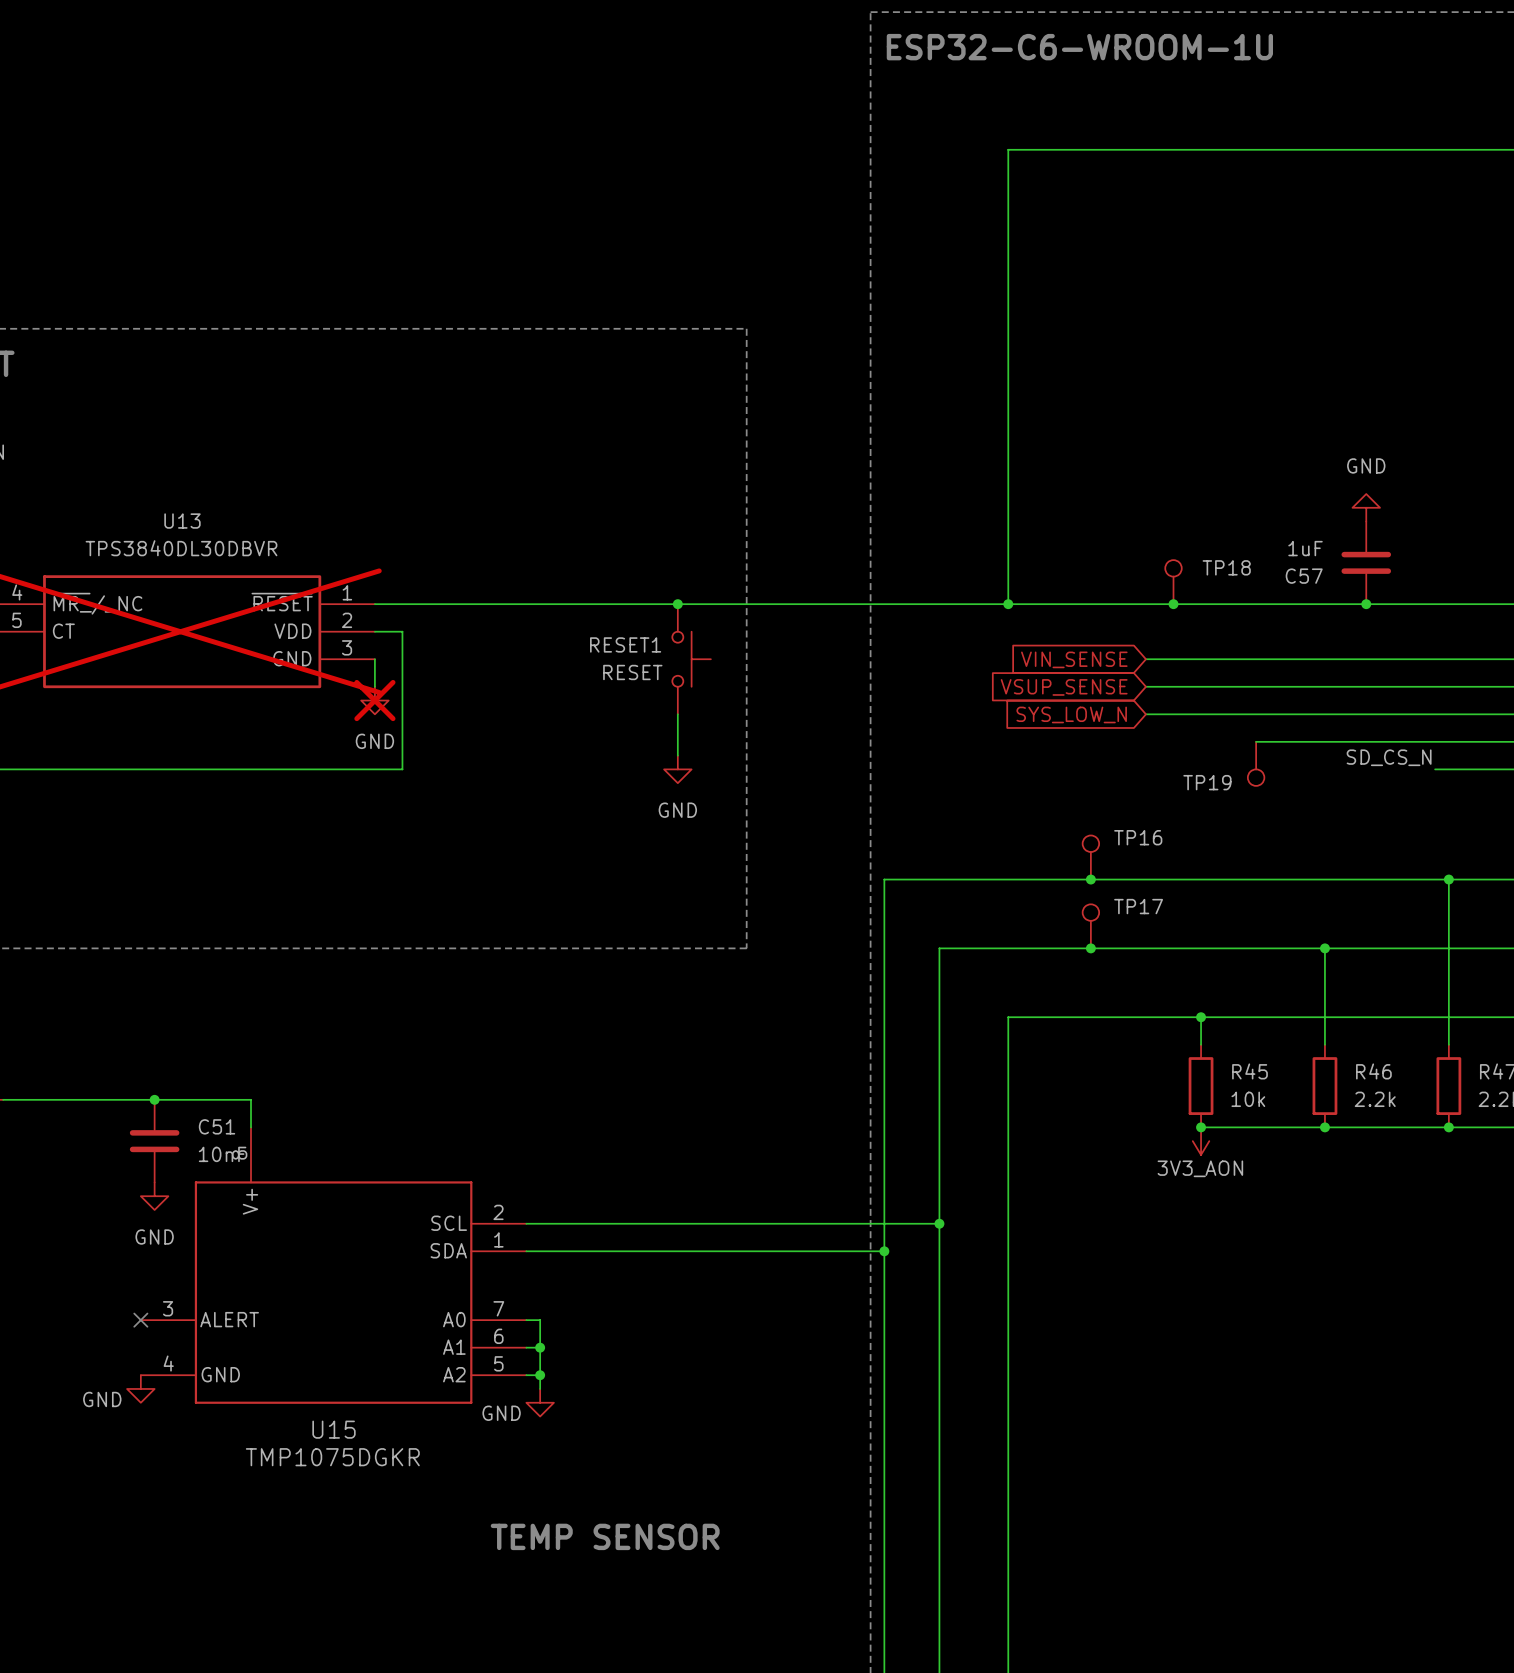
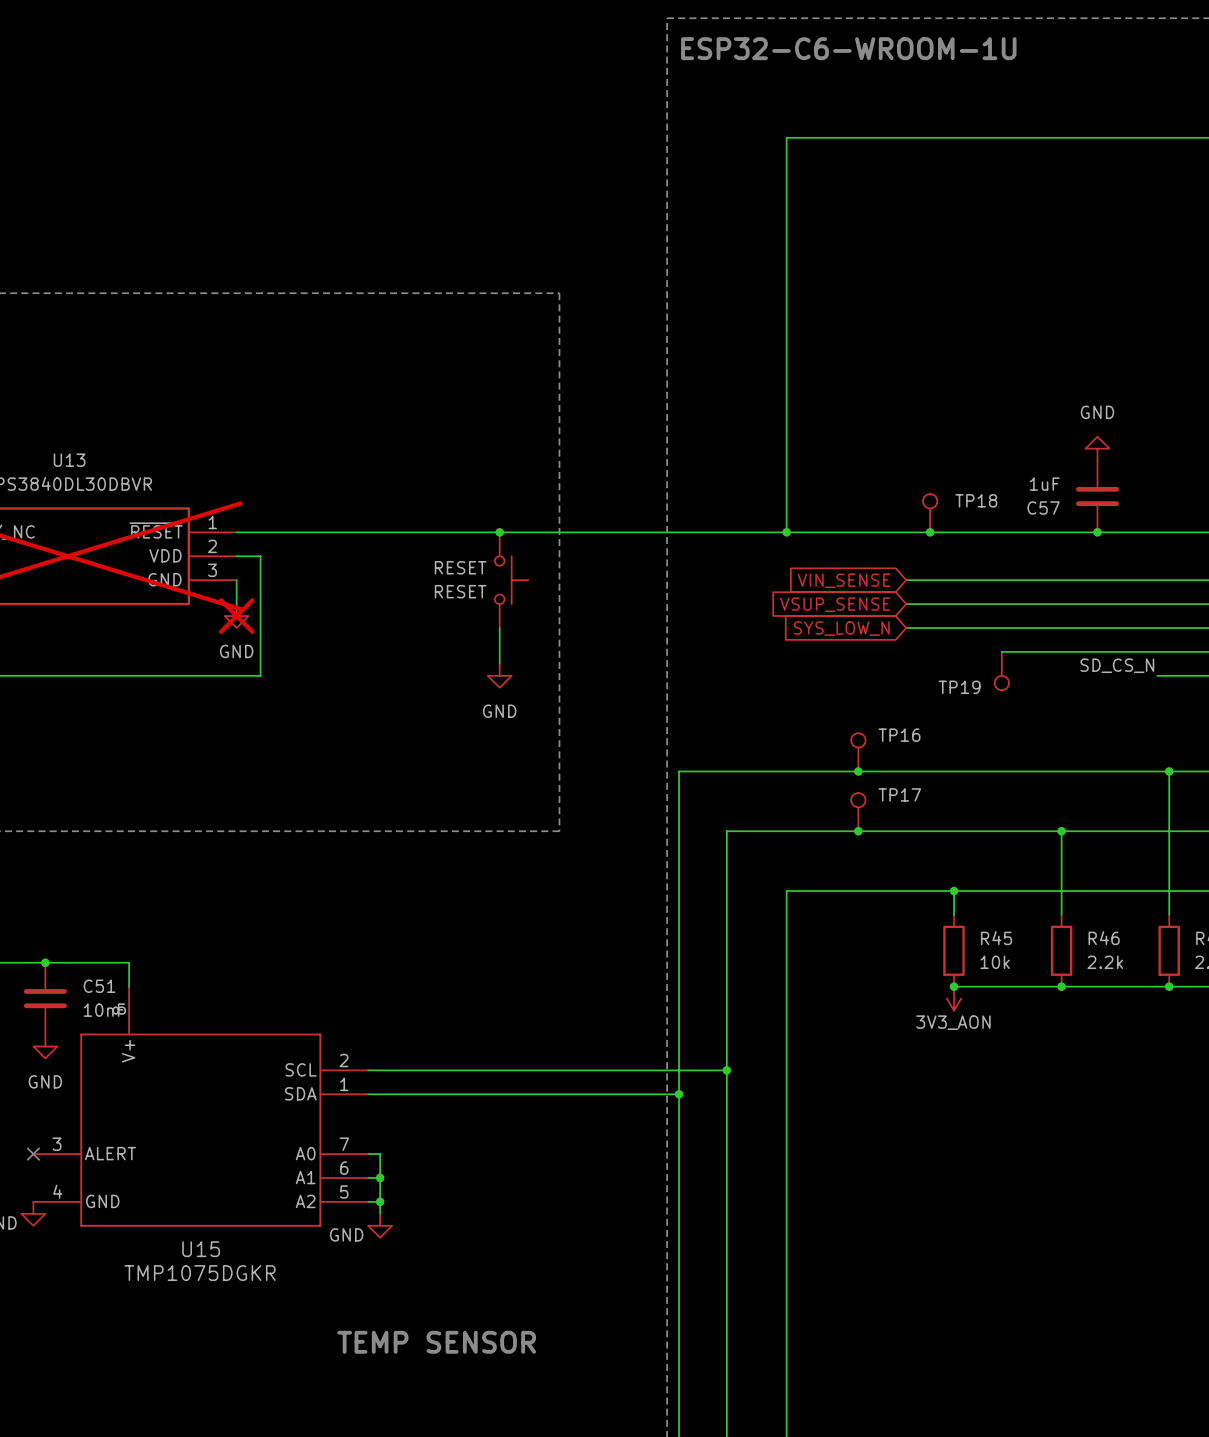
RESET1 name: RESET1 (625, 644) -> RESET (460, 567)

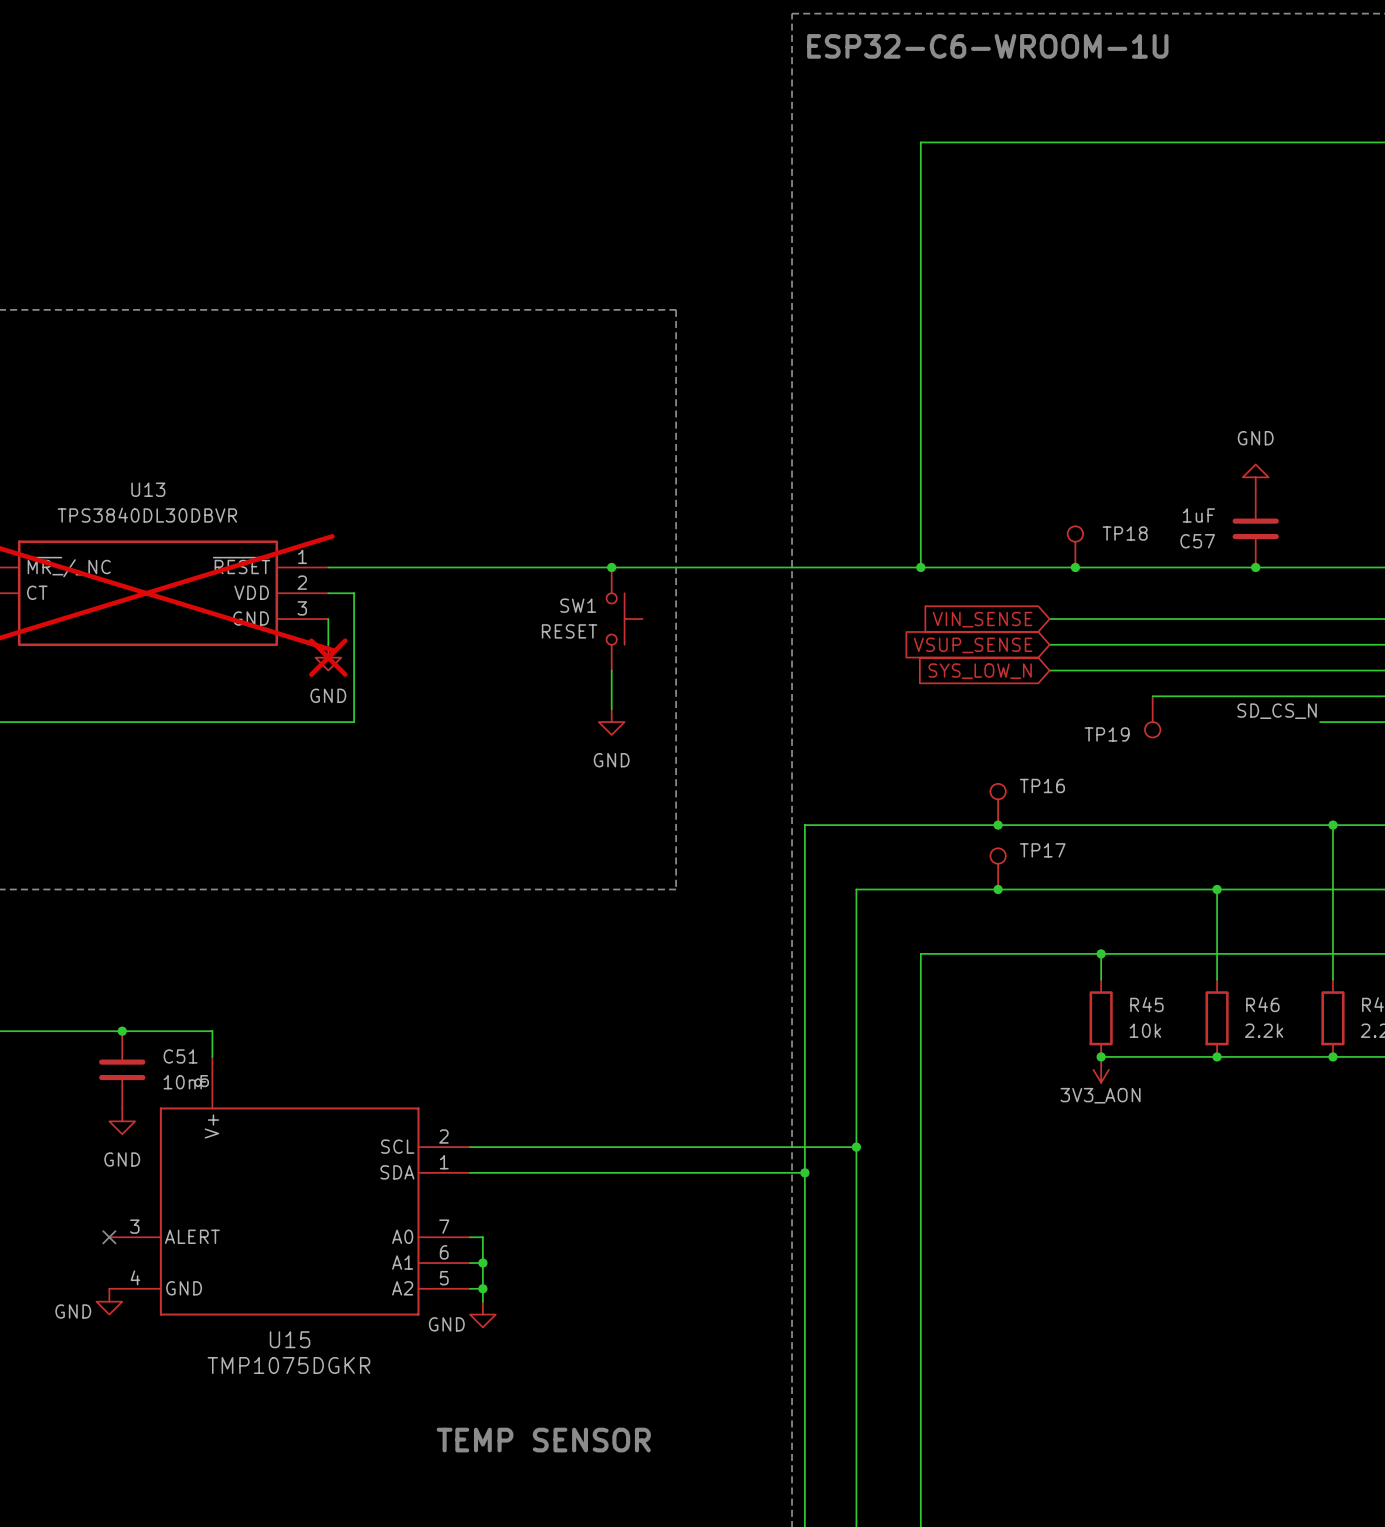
RESET name: RESET (460, 567) -> SW1 (578, 605)

